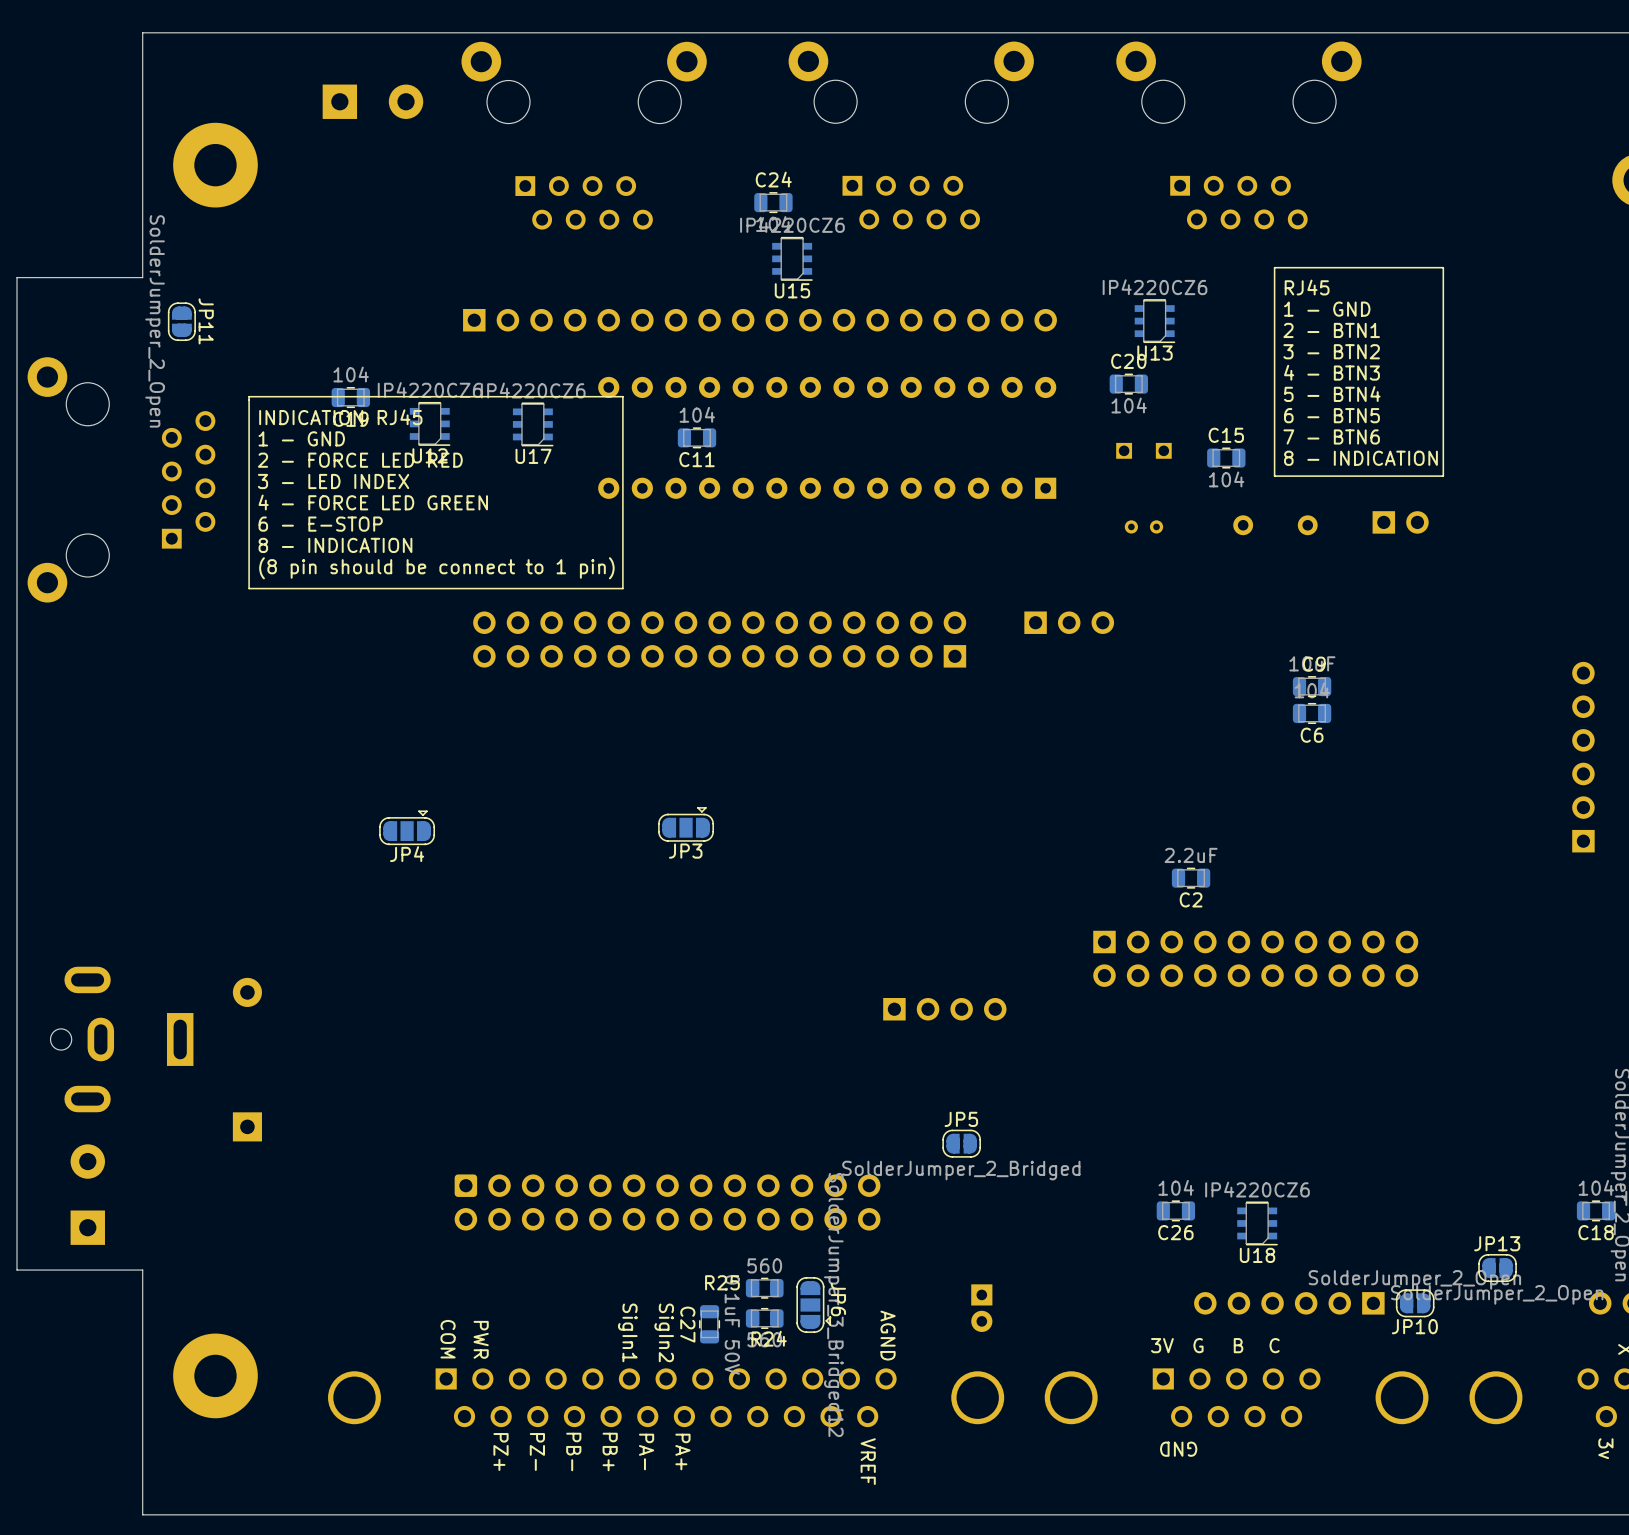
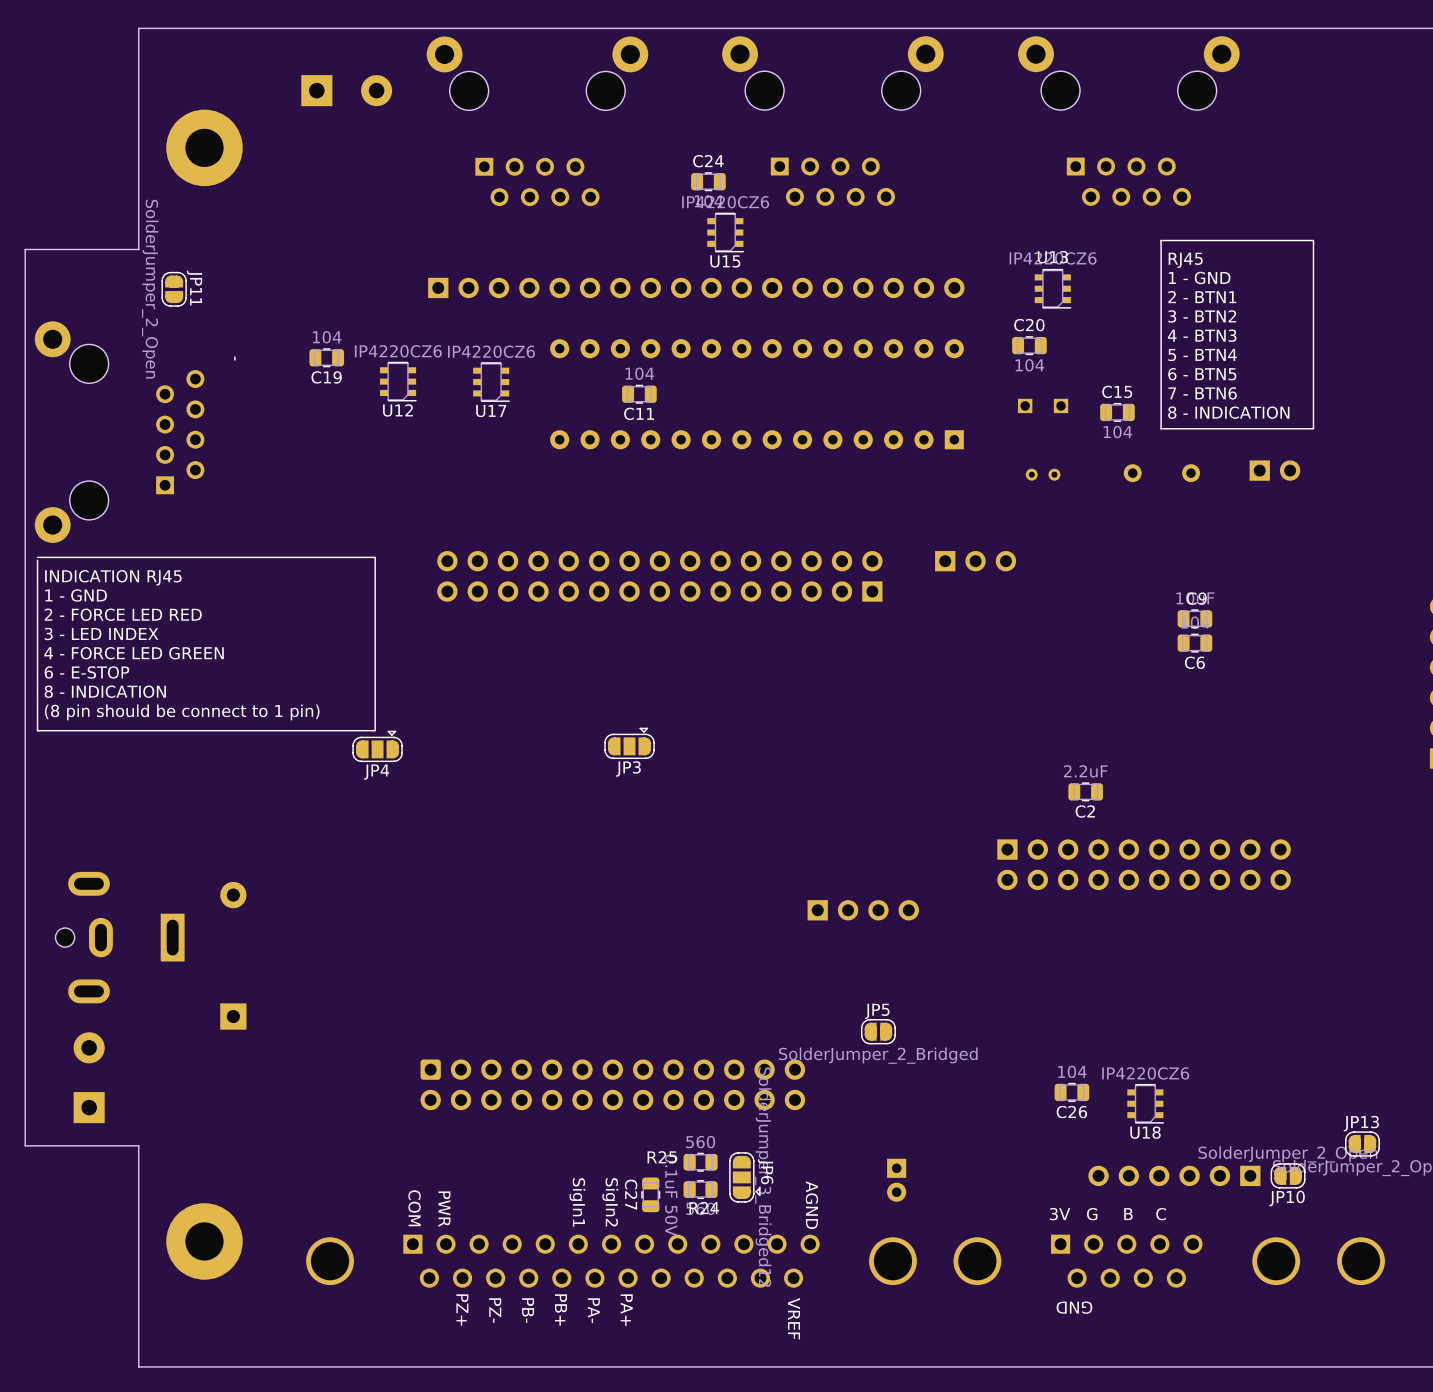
U13 name position: U13 (1155, 353) -> U13 (1052, 257)
line: (249, 396) (622, 396) (622, 588) (249, 588) (249, 400) -> (37, 557) (375, 557) (375, 730) (37, 730) (37, 560)
text position: INDICATION RJ45 (340, 417) -> INDICATION RJ45 (113, 577)
text position: 1 - GND (301, 438) -> 1 - GND (76, 595)
text position: 2 - FORCE LED RED (360, 460) -> 2 - FORCE LED RED (123, 614)
text position: 3 - LED INDEX (333, 481) -> 3 - LED INDEX (101, 633)
text position: 4 - FORCE LED GREEN (373, 502) -> 4 - FORCE LED GREEN (134, 653)
text position: 6 - E-STOP (320, 524) -> 6 - E-STOP (86, 672)
text position: 8 - INDICATION (335, 545) -> 8 - INDICATION (105, 691)
text position: (8 pin should be connect to 1 pin) (436, 568) -> (8 pin should be connect to 1 pin) (182, 712)

